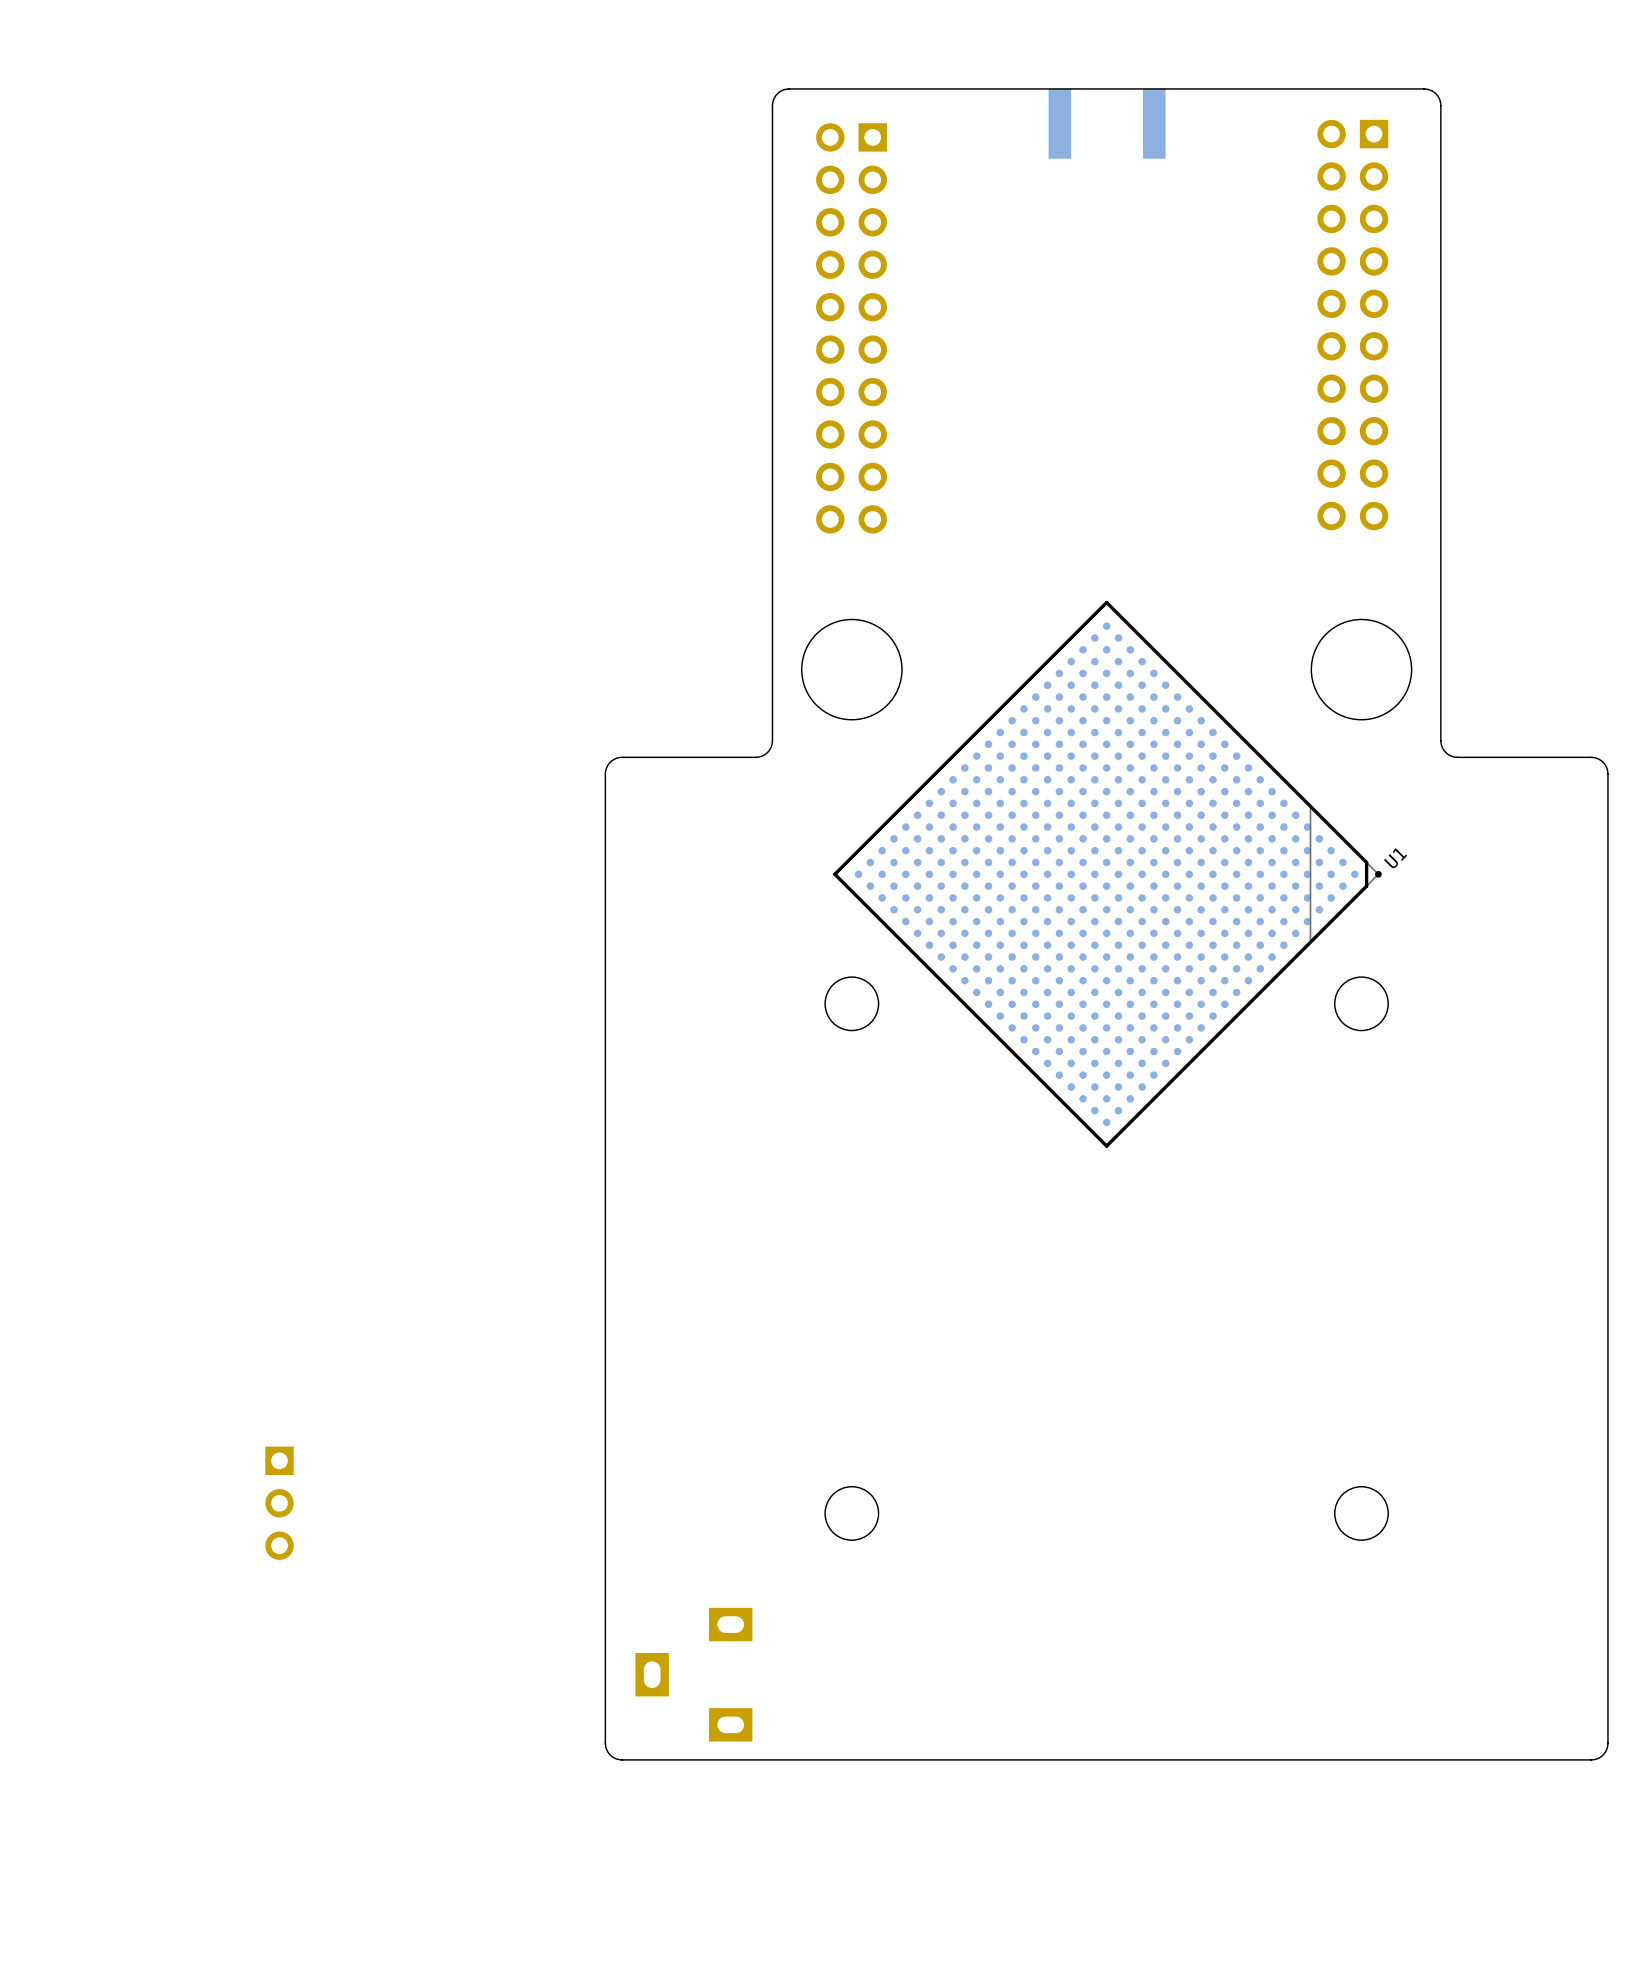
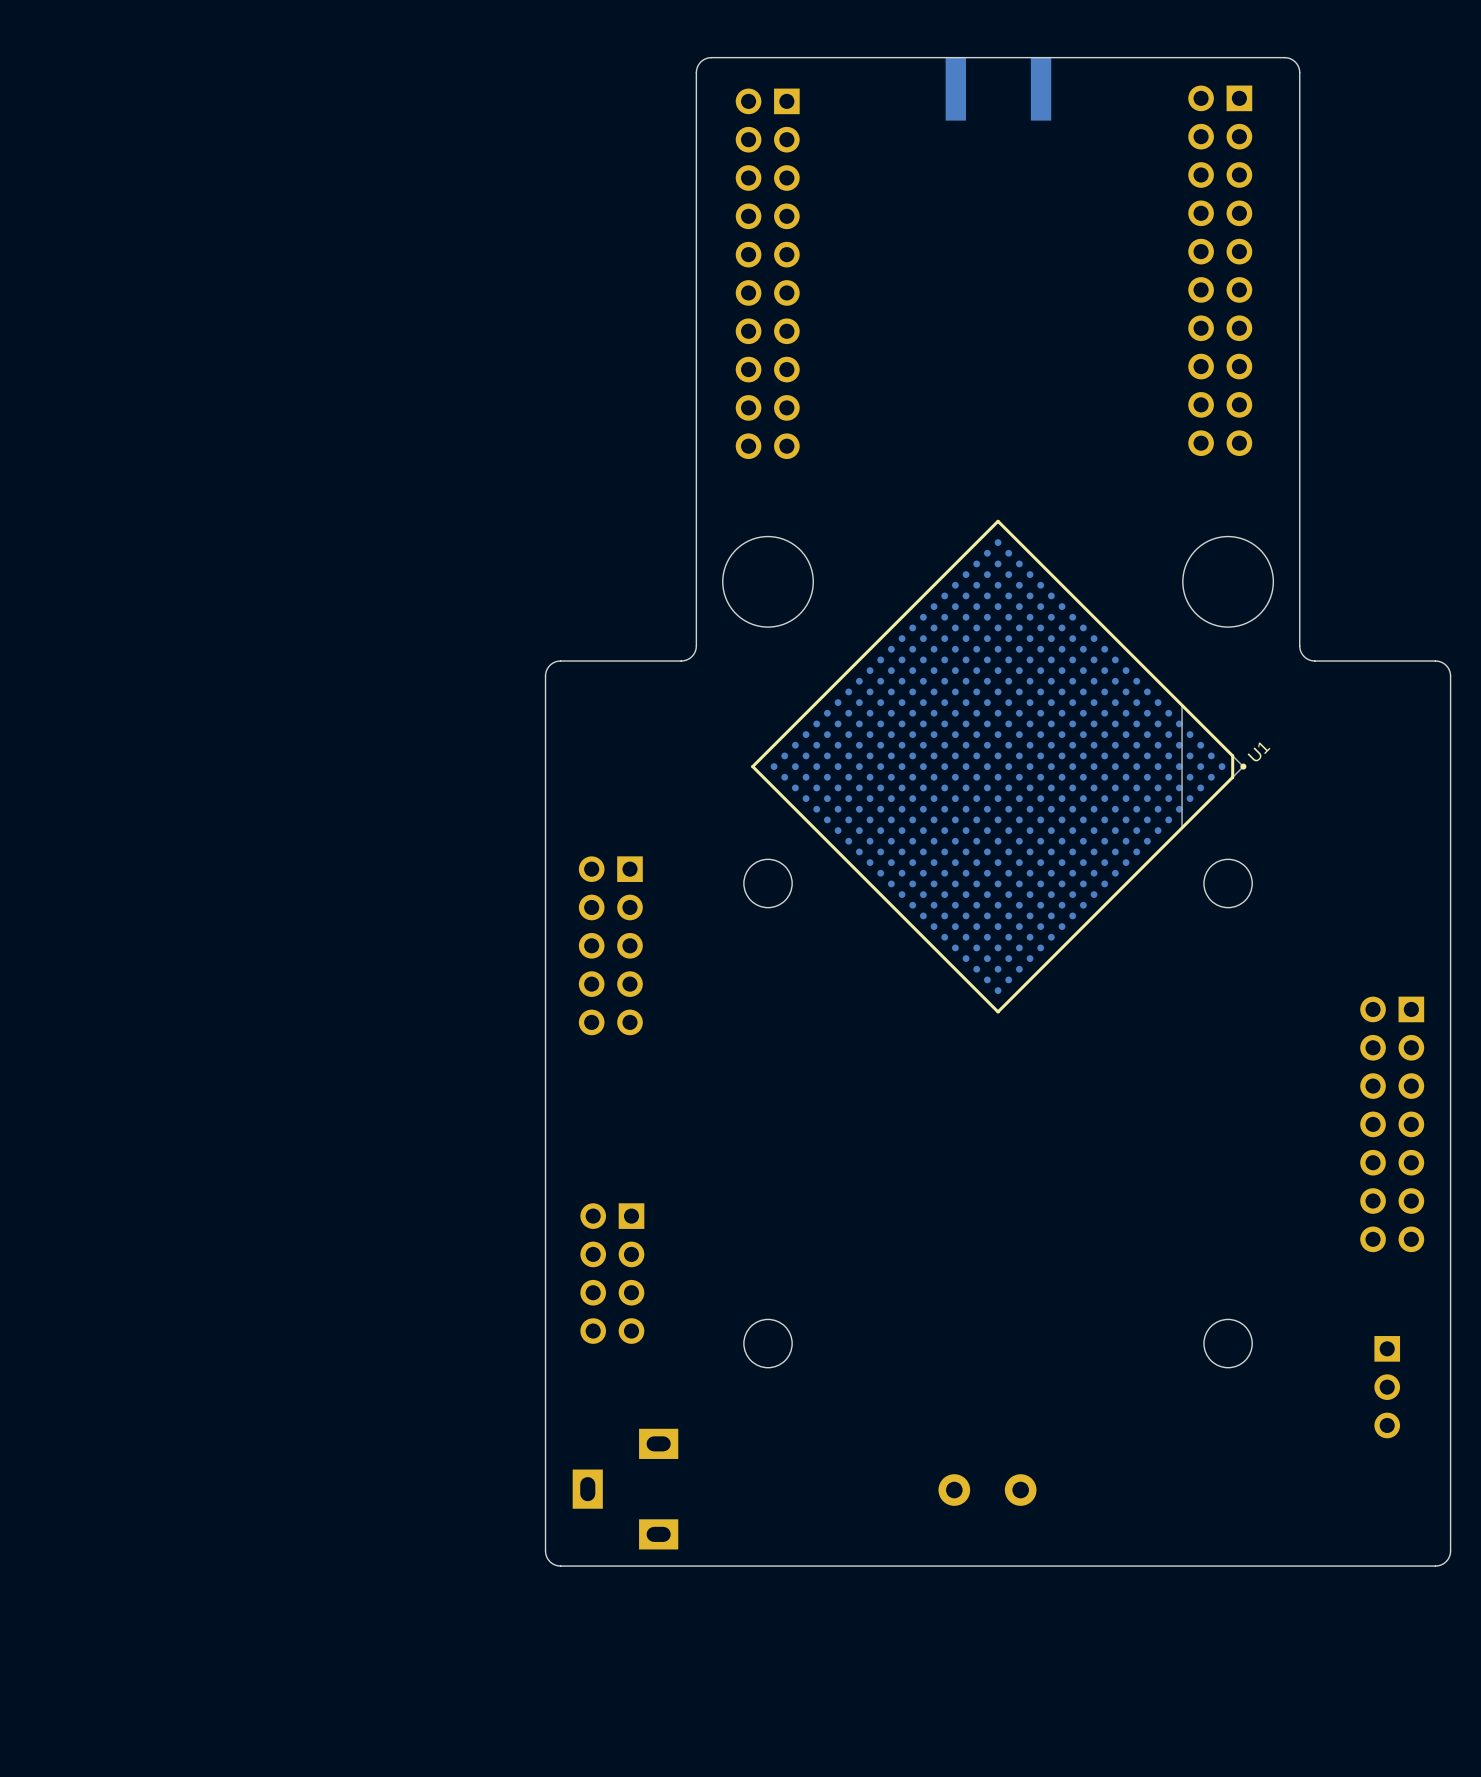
part: none -> (610, 945)
part: none -> (1392, 1124)
part: none -> (612, 1273)
part: (279, 1503) -> none
part: none -> (1387, 1387)
part: none -> (987, 1490)

